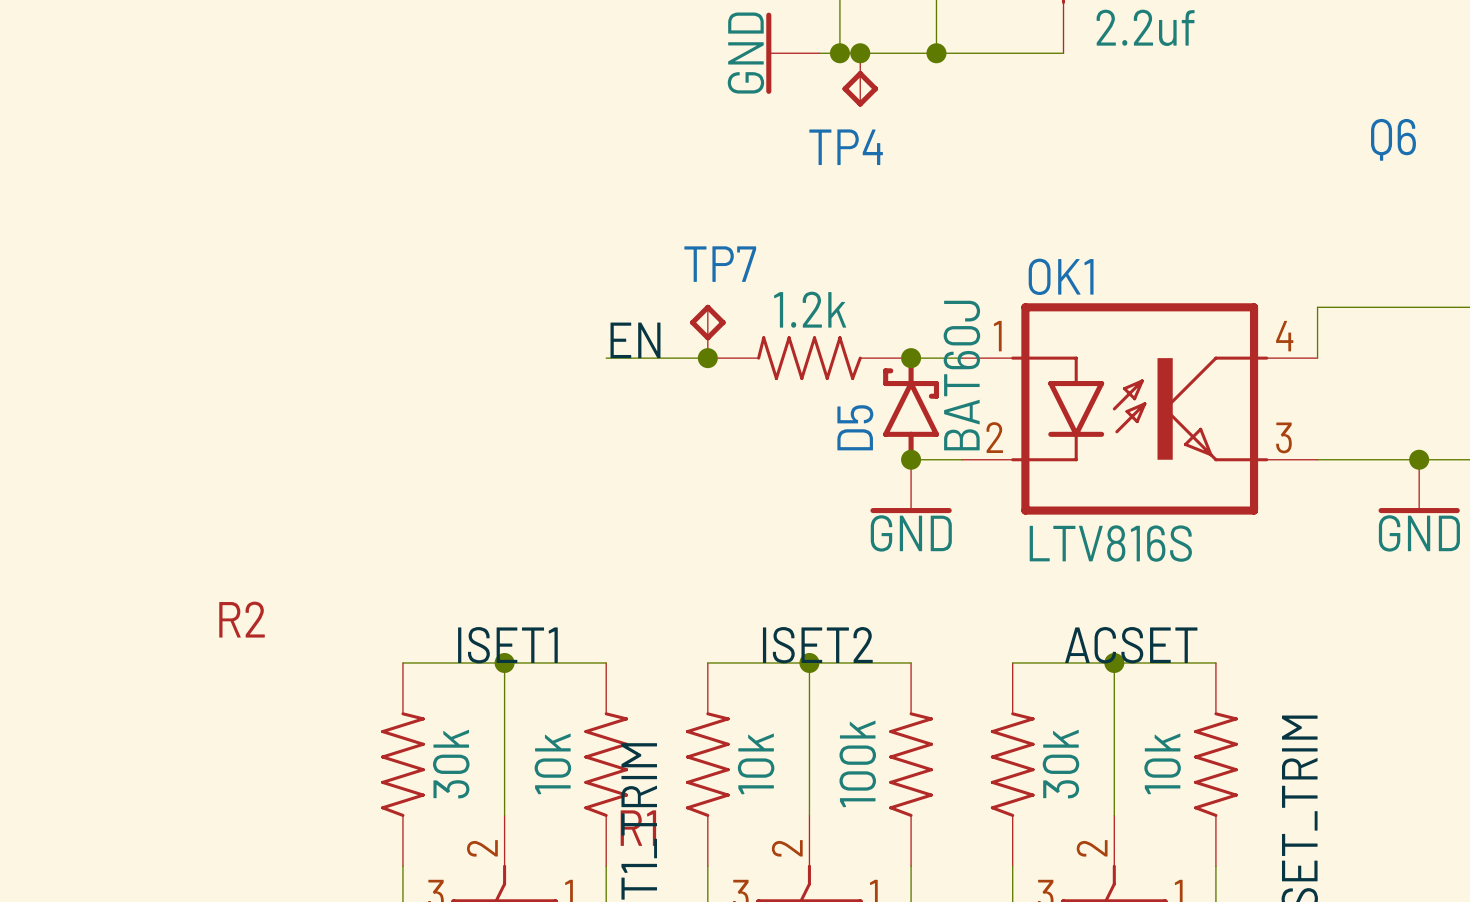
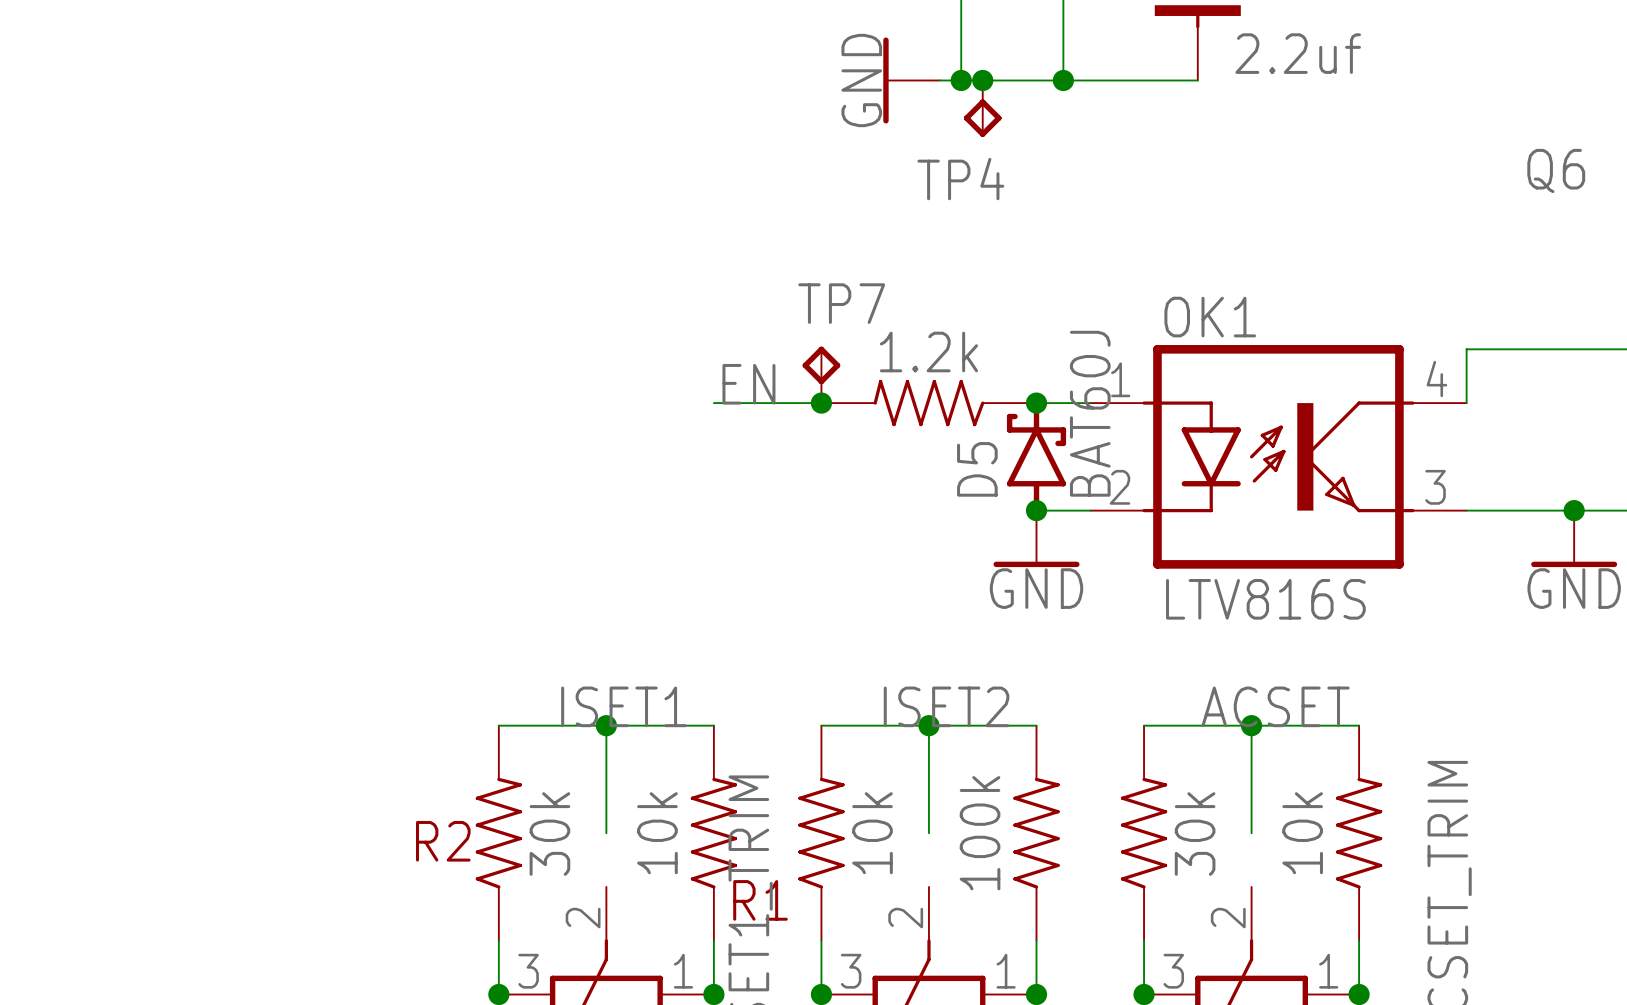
text position: R2 (242, 619) -> R2 (443, 841)
wire: (504, 764) (504, 815) -> none
wire: (809, 764) (809, 815) -> none
wire: (1114, 764) (1114, 815) -> none

